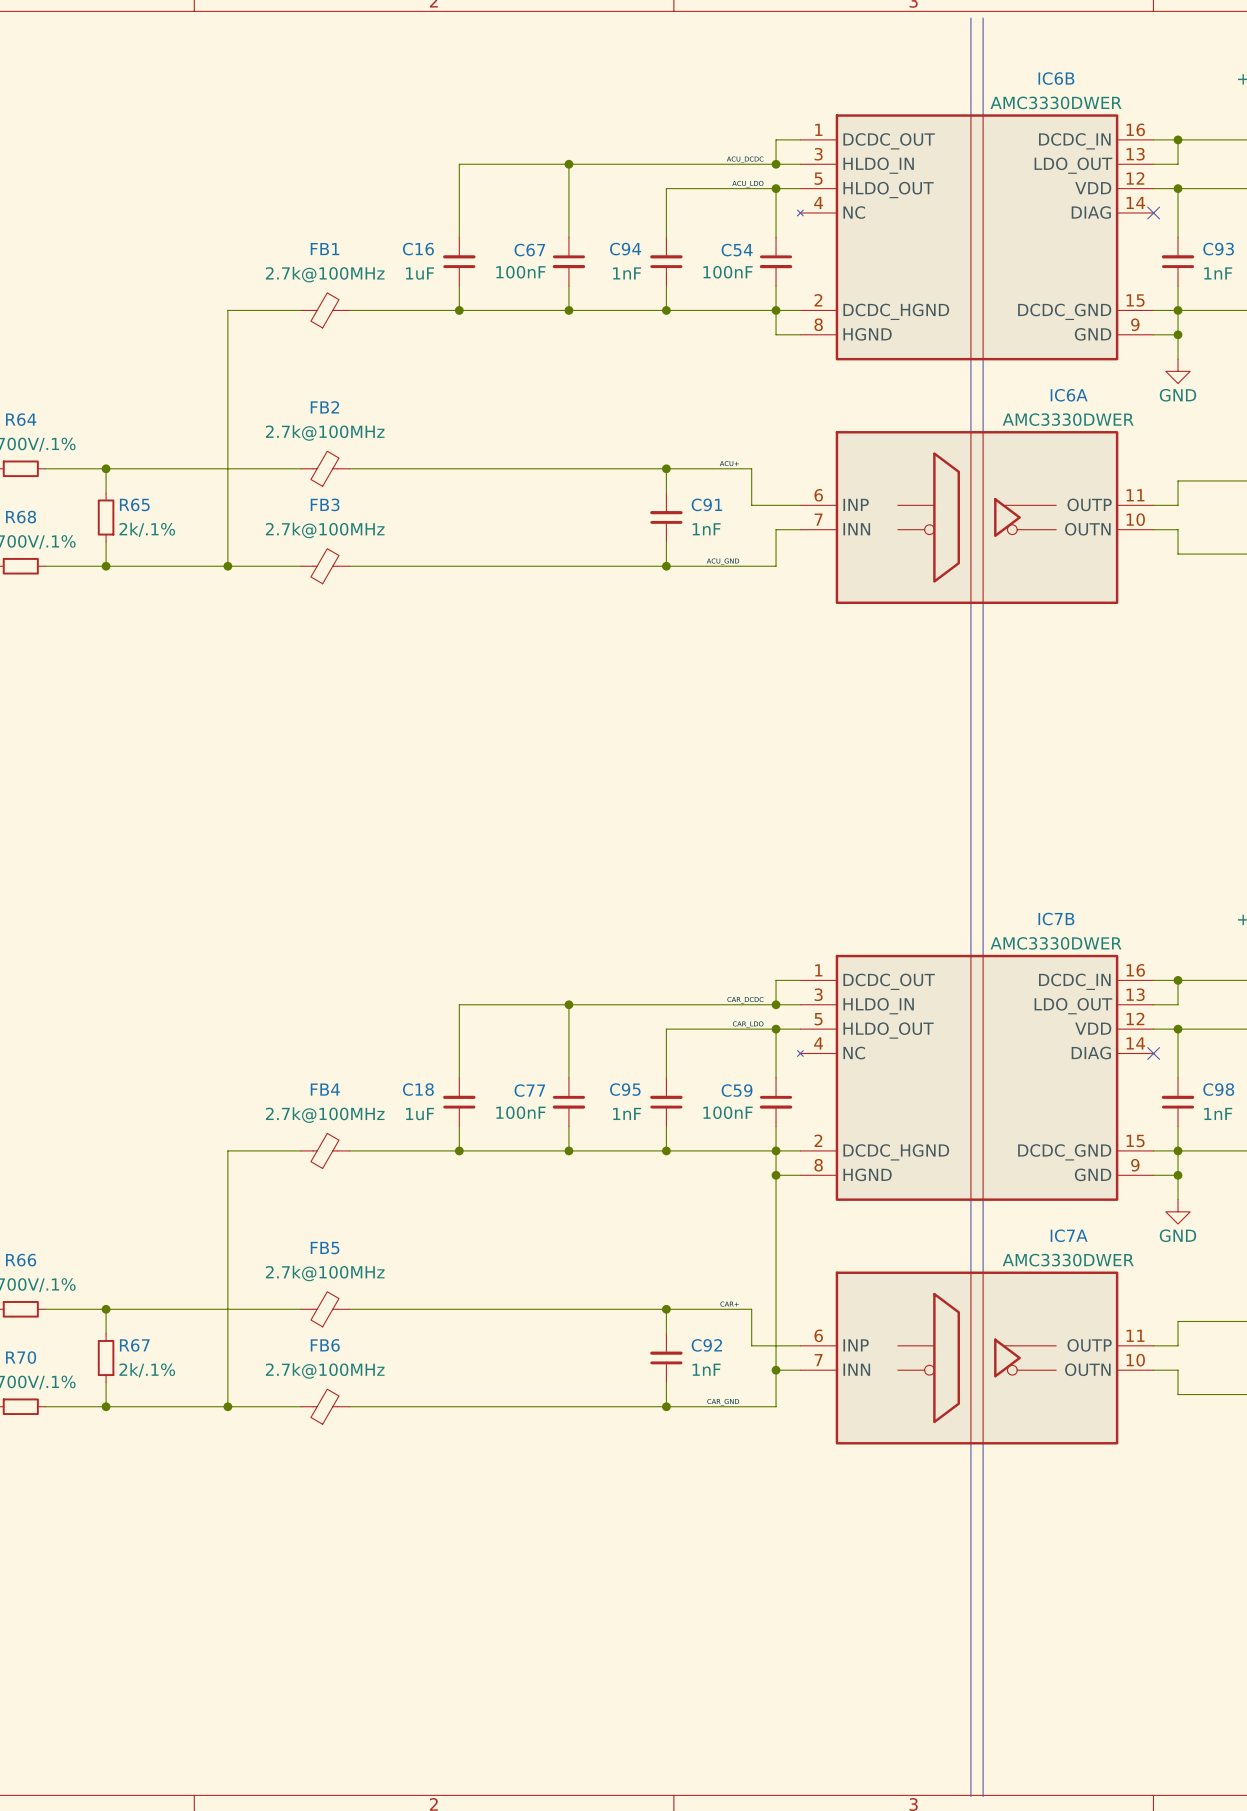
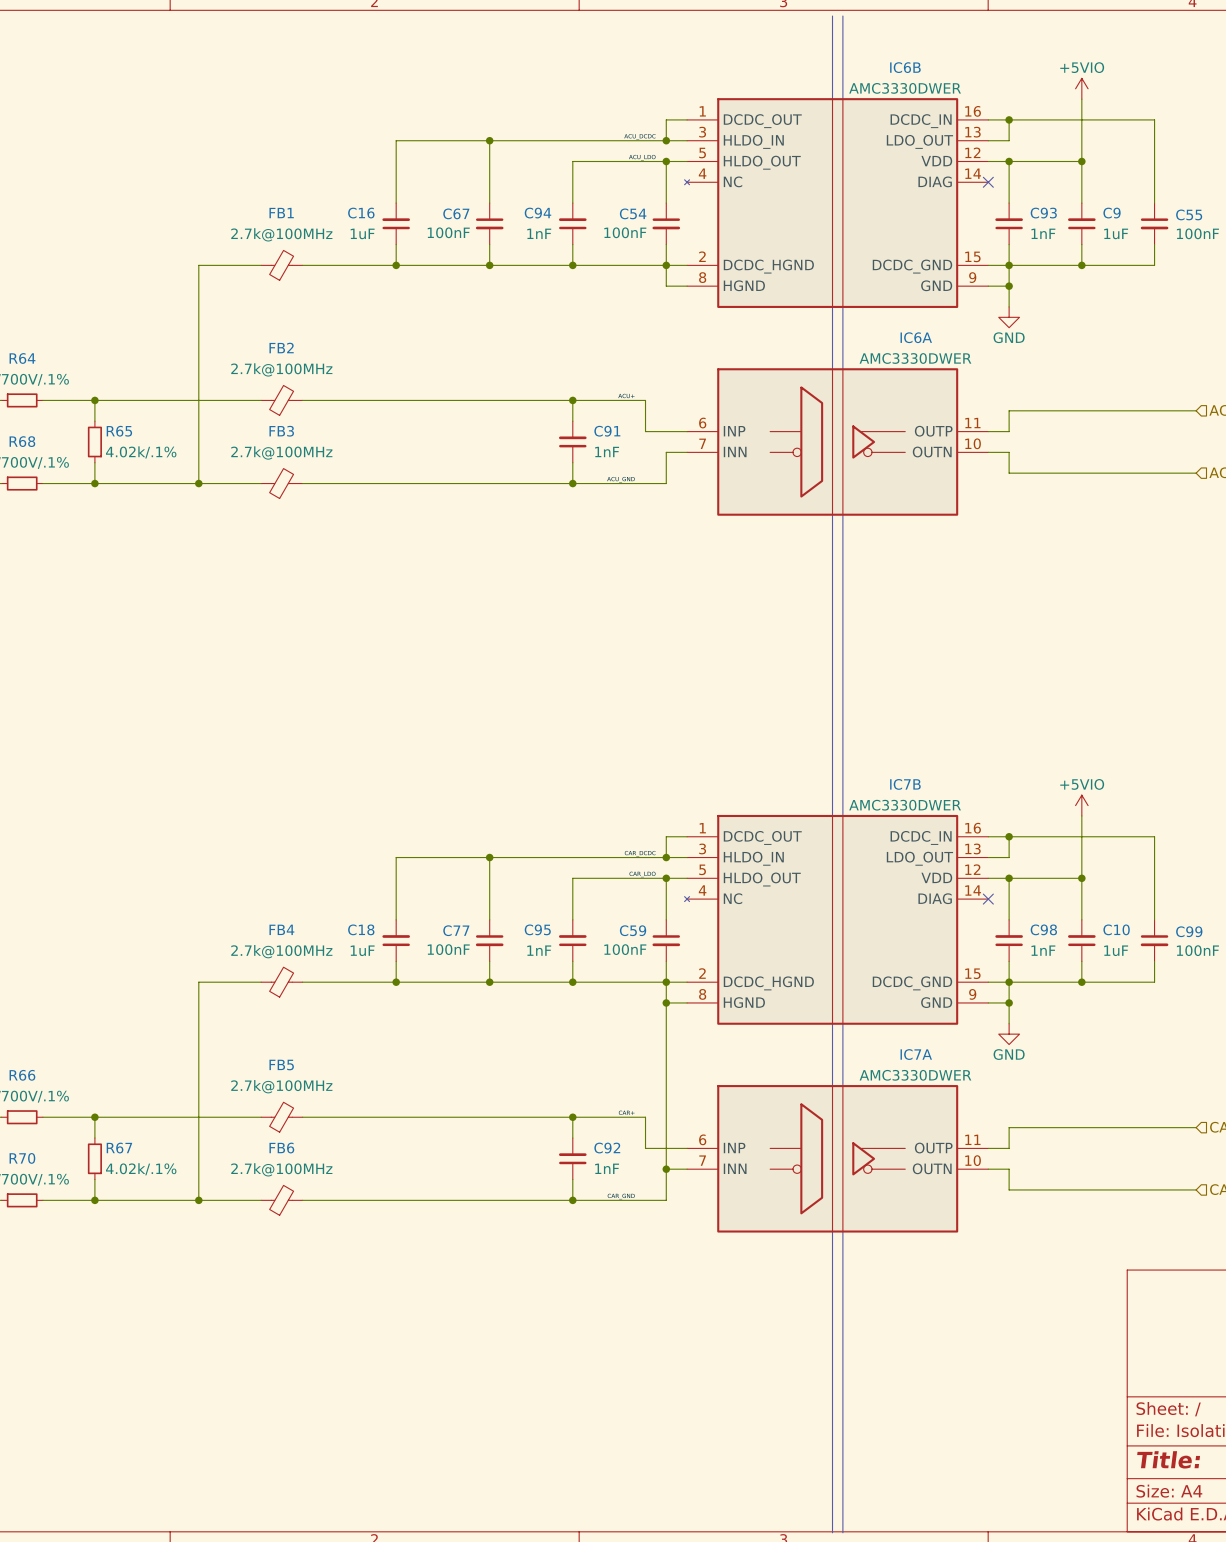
R65 value: 2k/.1% (147, 529) -> 4.02k/.1% (141, 452)
R67 value: 2k/.1% (147, 1370) -> 4.02k/.1% (141, 1169)

